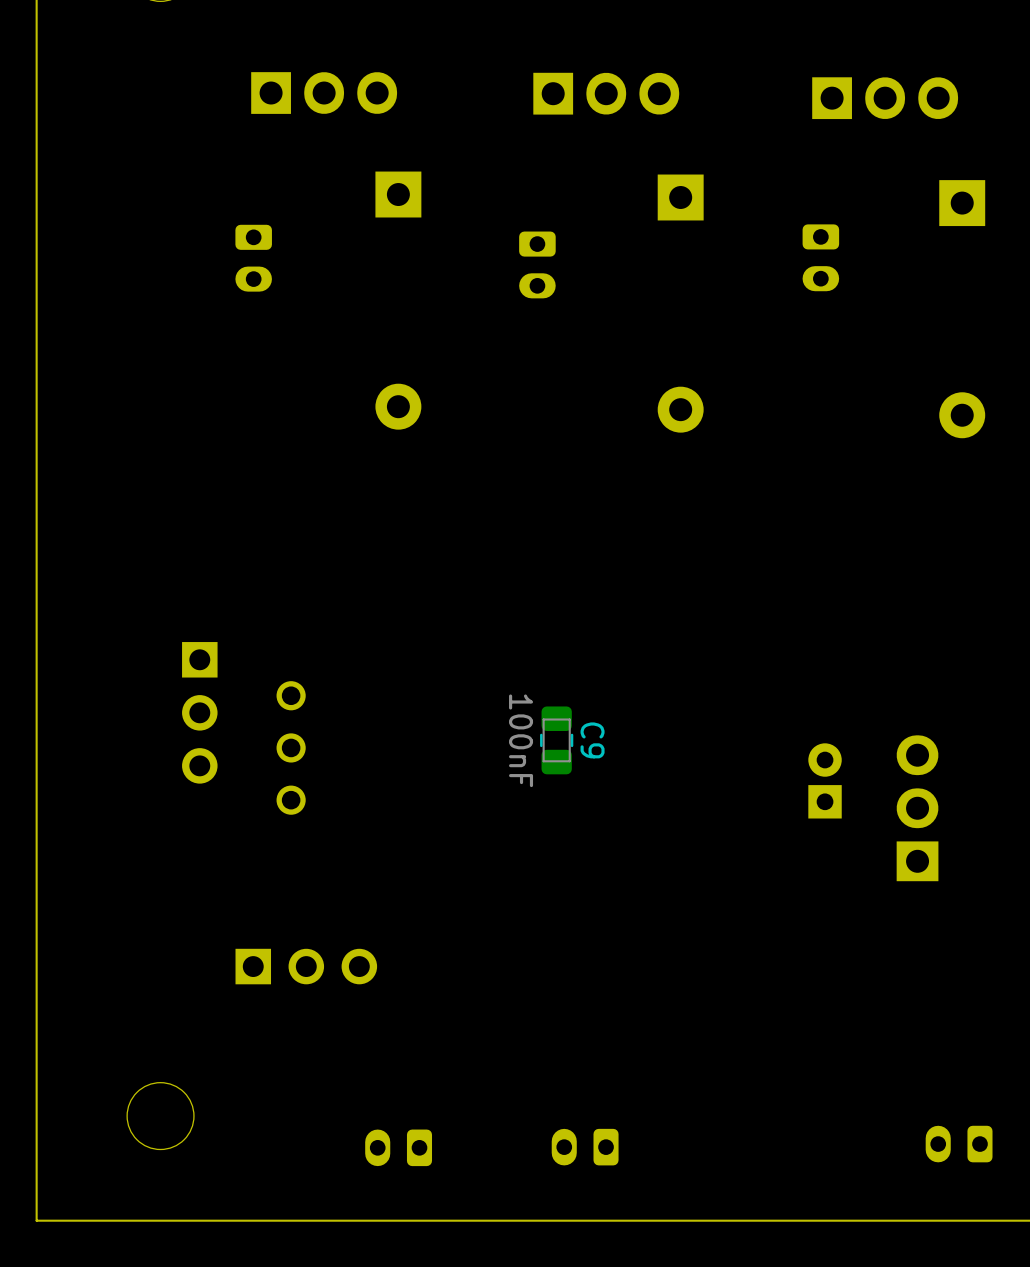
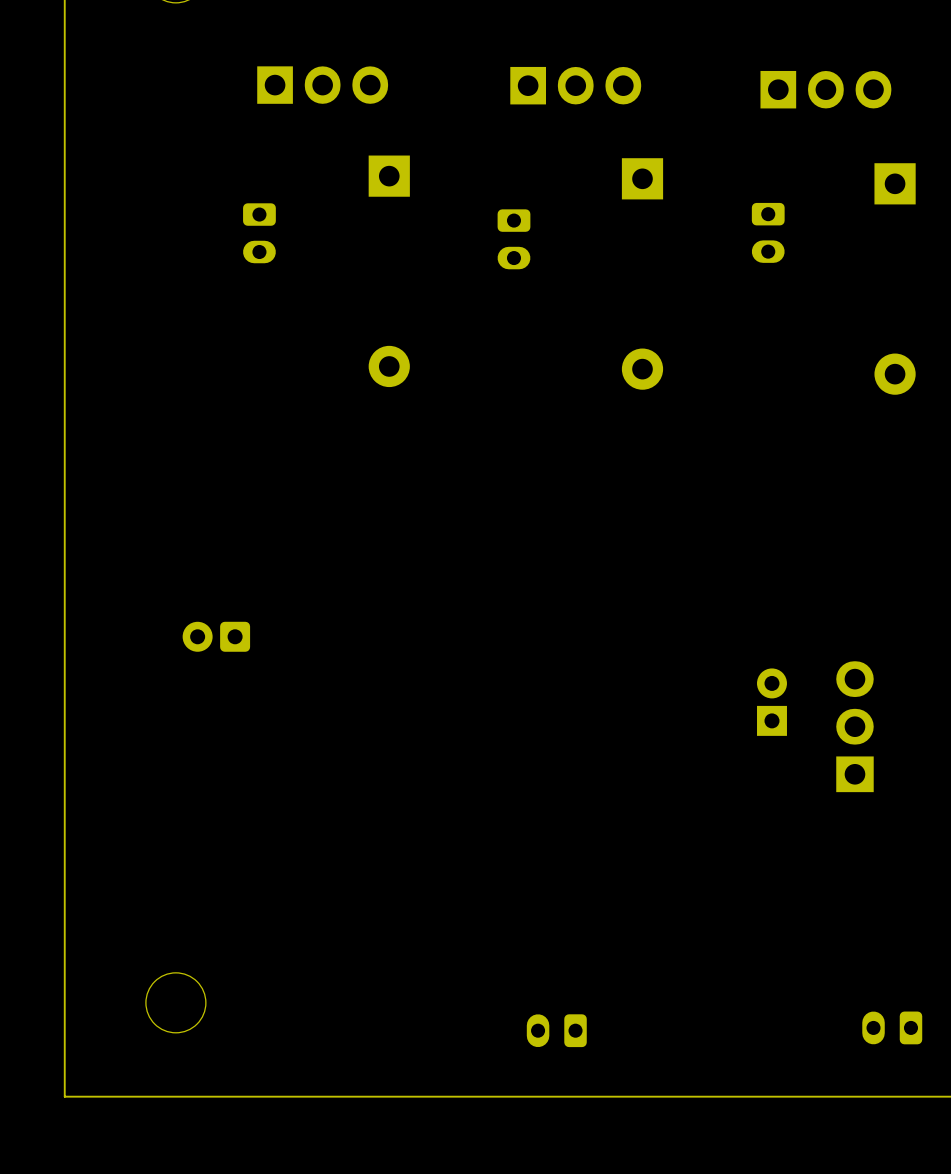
part footprint: [182, 642, 218, 784] -> [182, 621, 251, 652]
C9: 100nF (556, 740) -> none
part: (291, 747) -> none
part: (306, 966) -> none
part: (398, 1147) -> none

